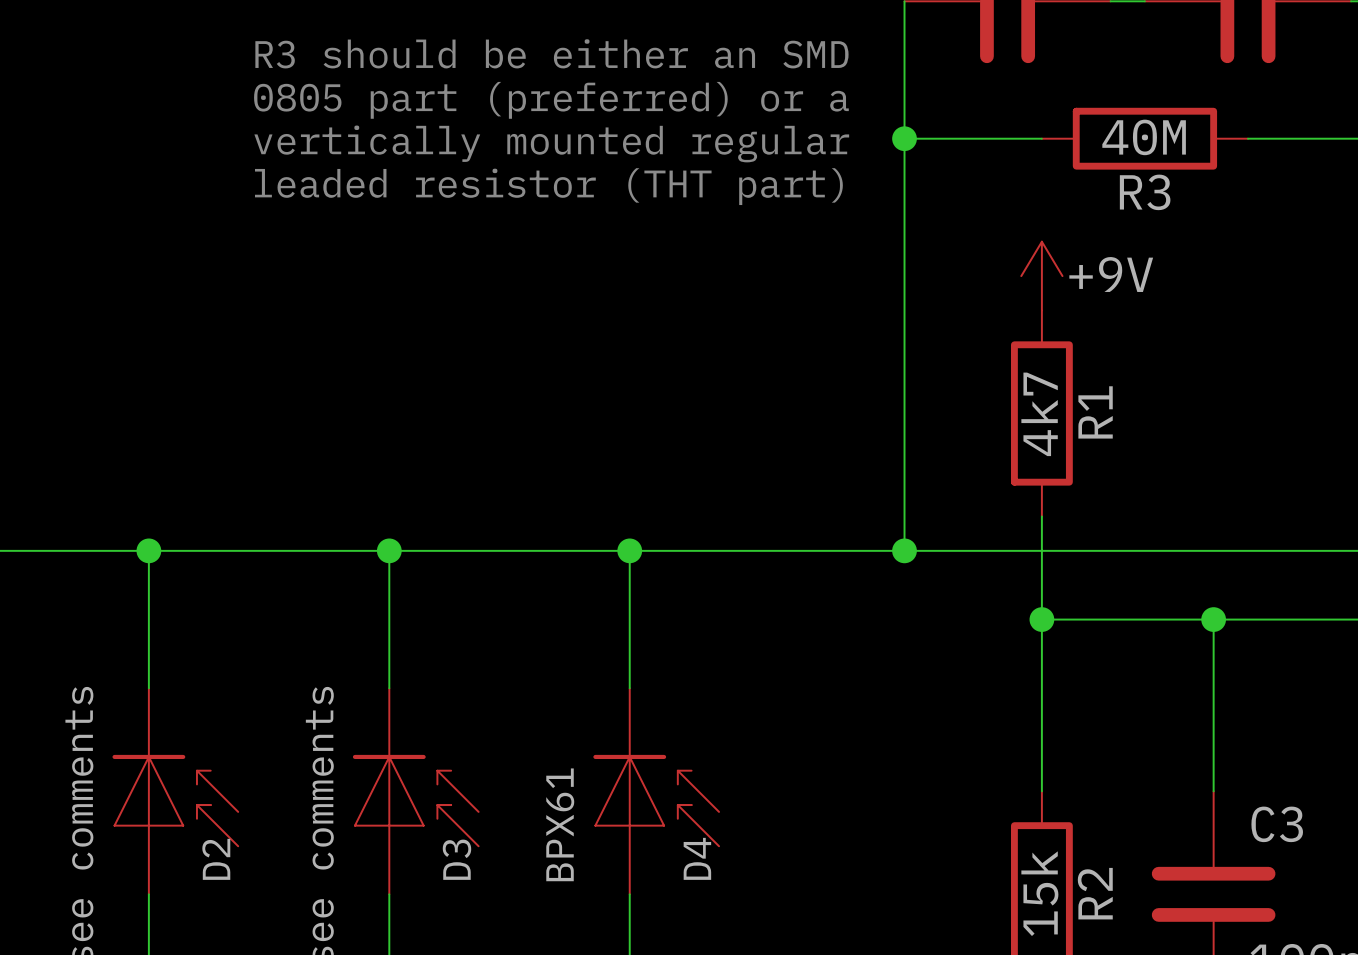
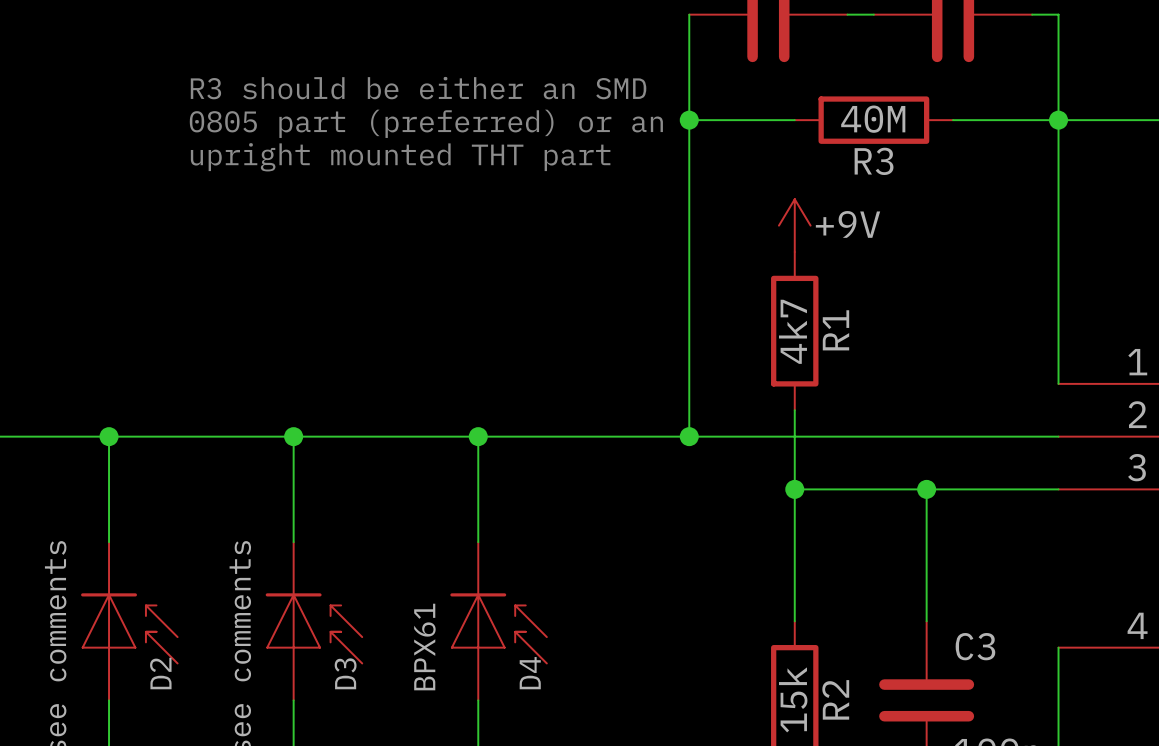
text: R3 should be either an SMD (551, 53) -> none
text: 0805 part (preferred) or a (551, 100) -> R3 should be either an SMD (418, 88)
text: vertically mounted regular (551, 143) -> 0805 part (preferred) or an (426, 123)
text: leaded resistor (THT part) (548, 186) -> upright mounted THT part (400, 157)

